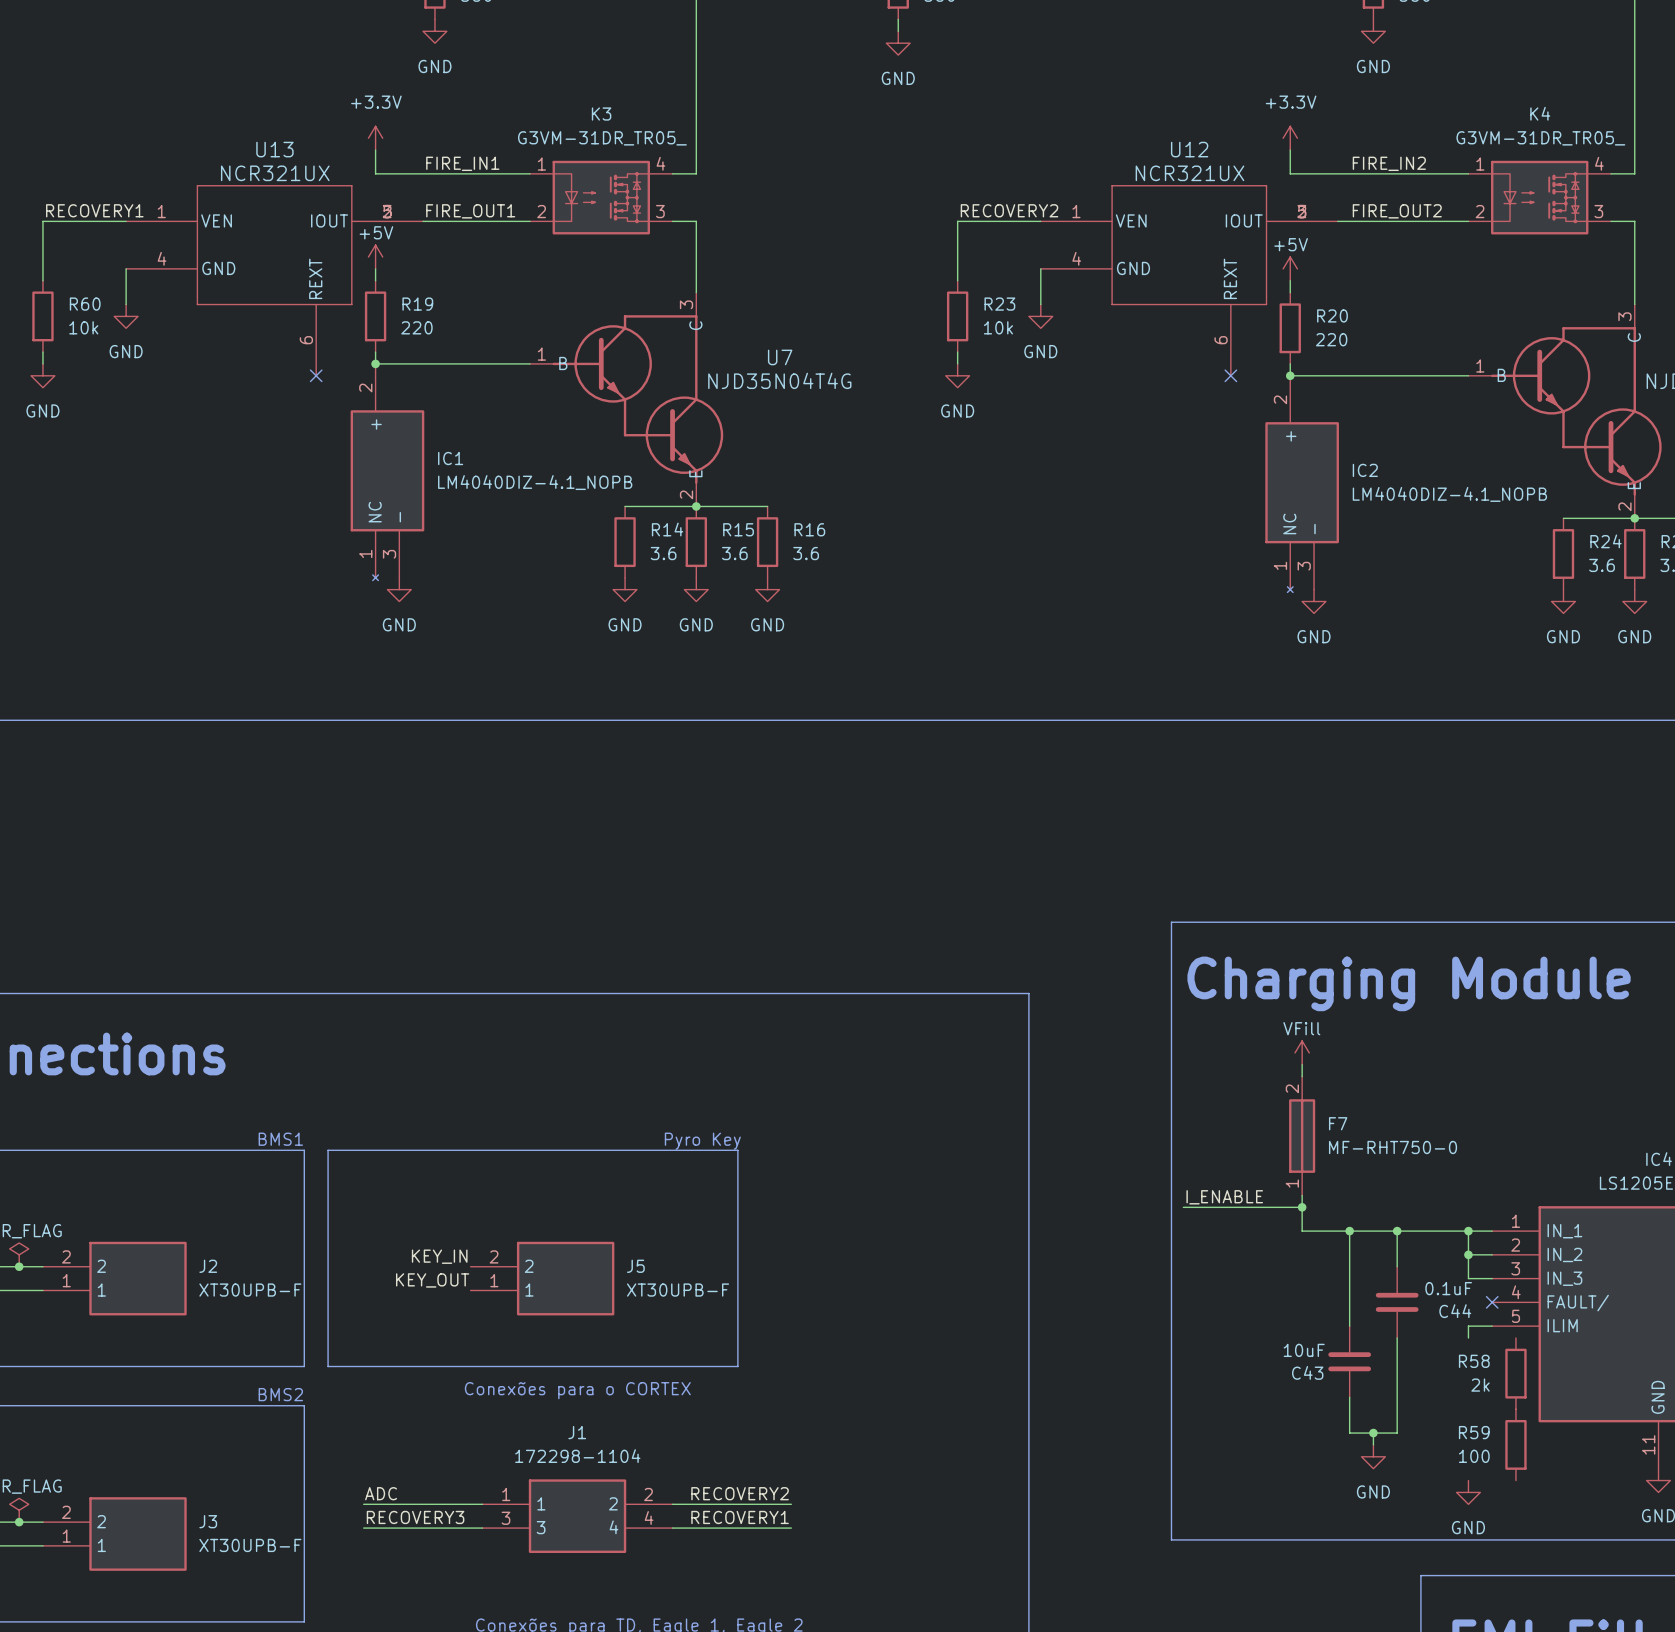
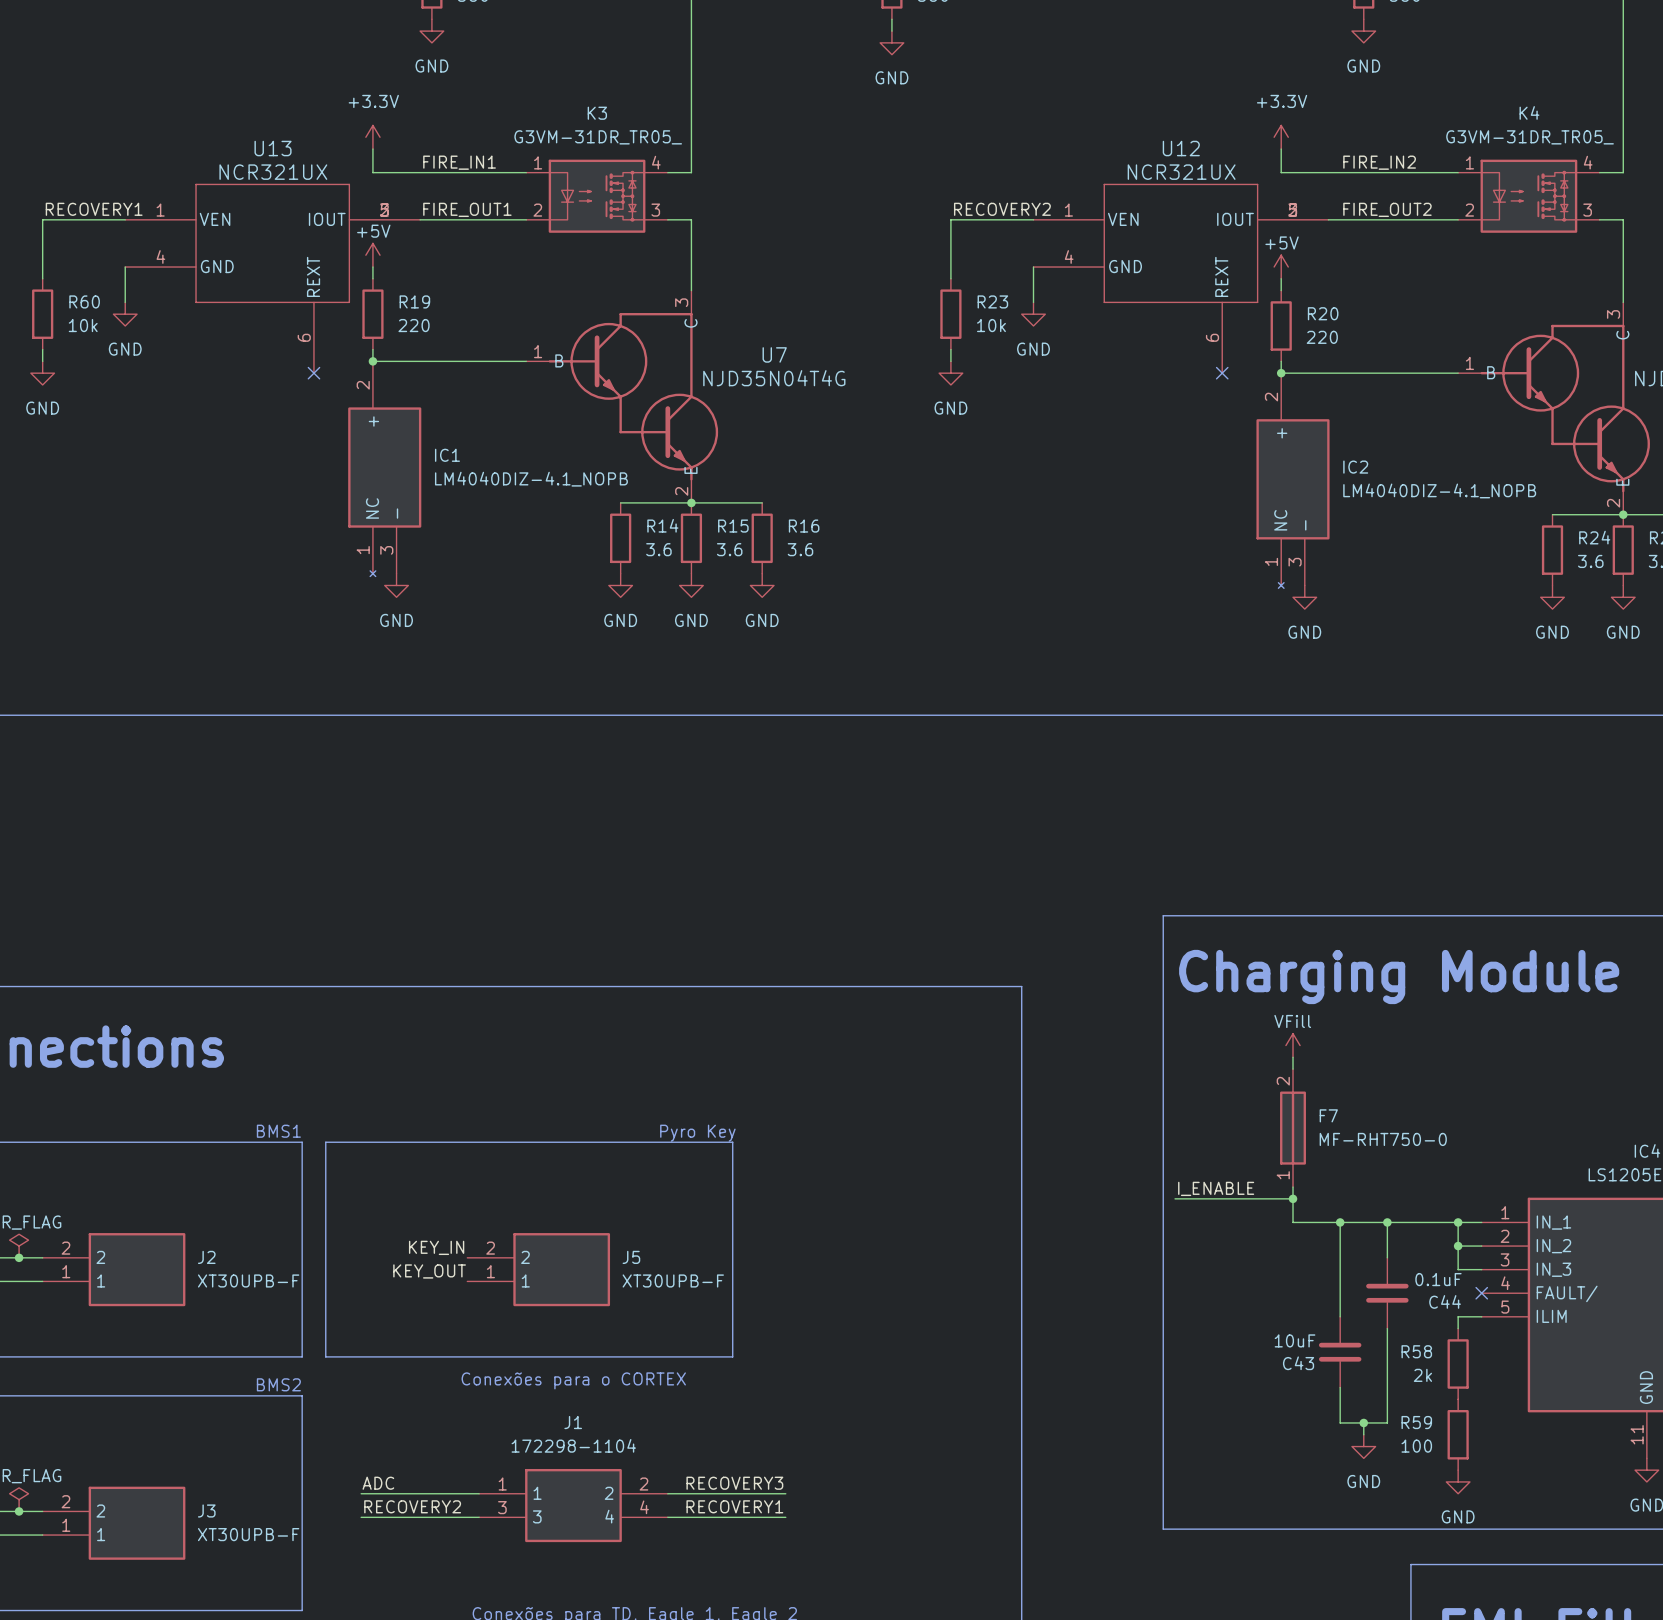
R58 position: (1515, 1373) -> (1458, 1364)
R59 position: (1515, 1444) -> (1458, 1434)
label: RECOVERY2 (740, 1493) -> RECOVERY3 (734, 1483)
label: RECOVERY3 (415, 1517) -> RECOVERY2 (412, 1506)

